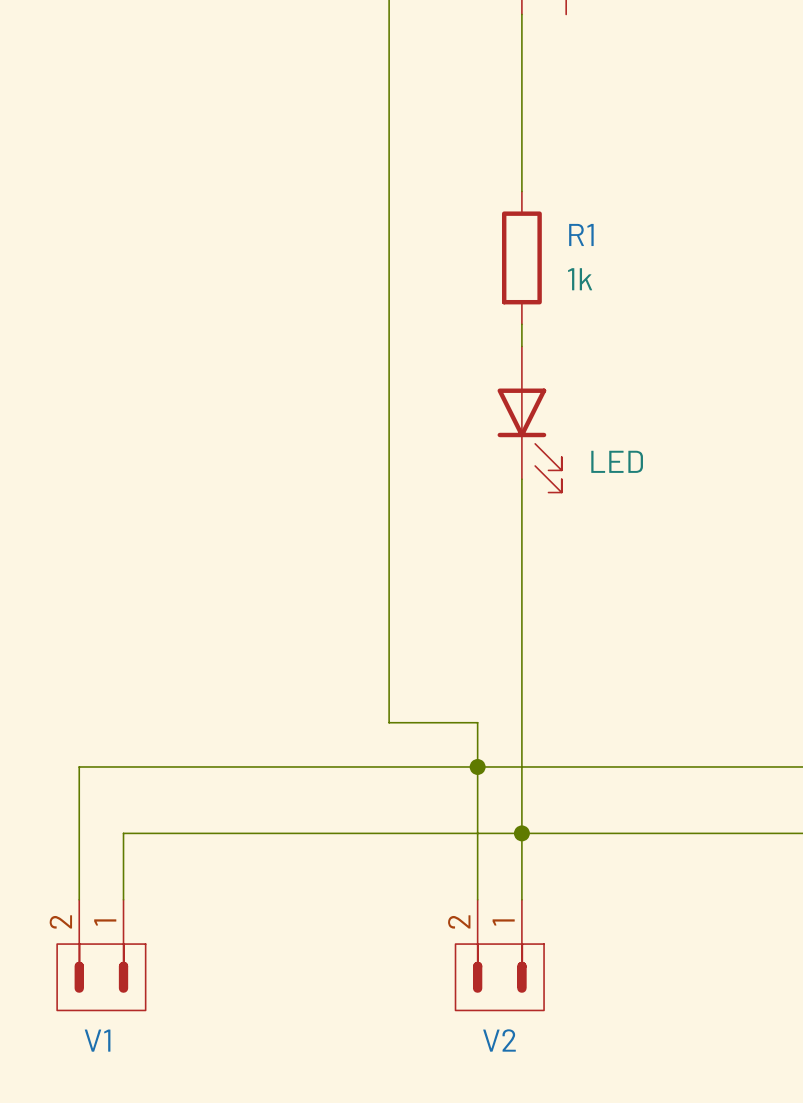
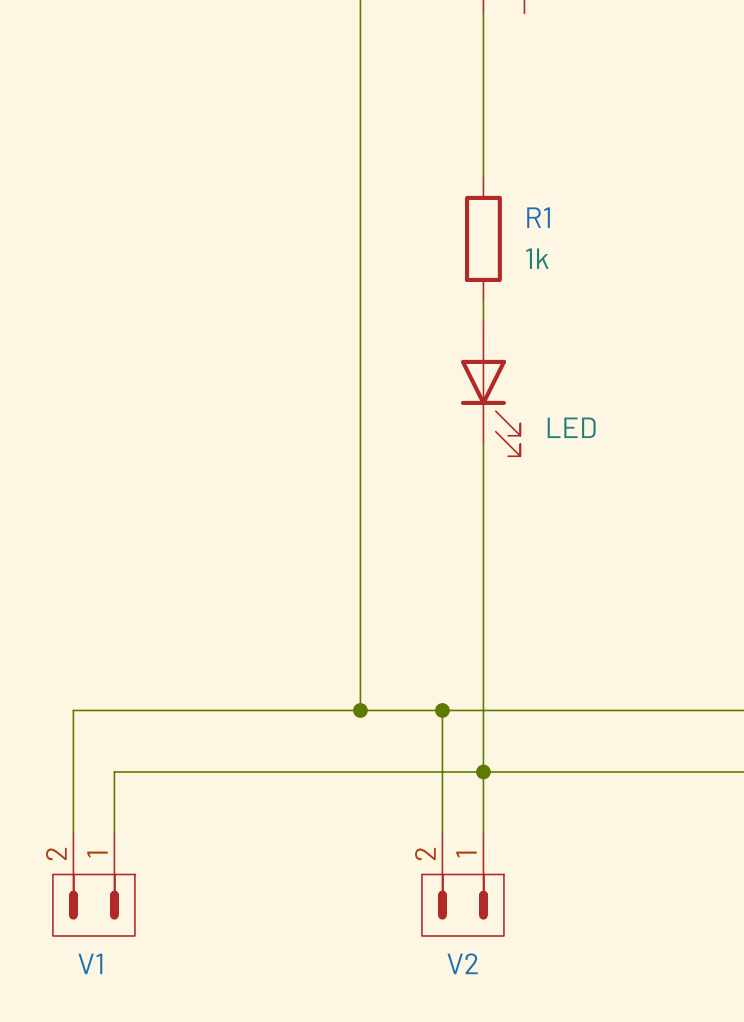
wire: (389, 722) (477, 722) (477, 766) -> (360, 669) (360, 710)
junction: none -> (360, 710)

